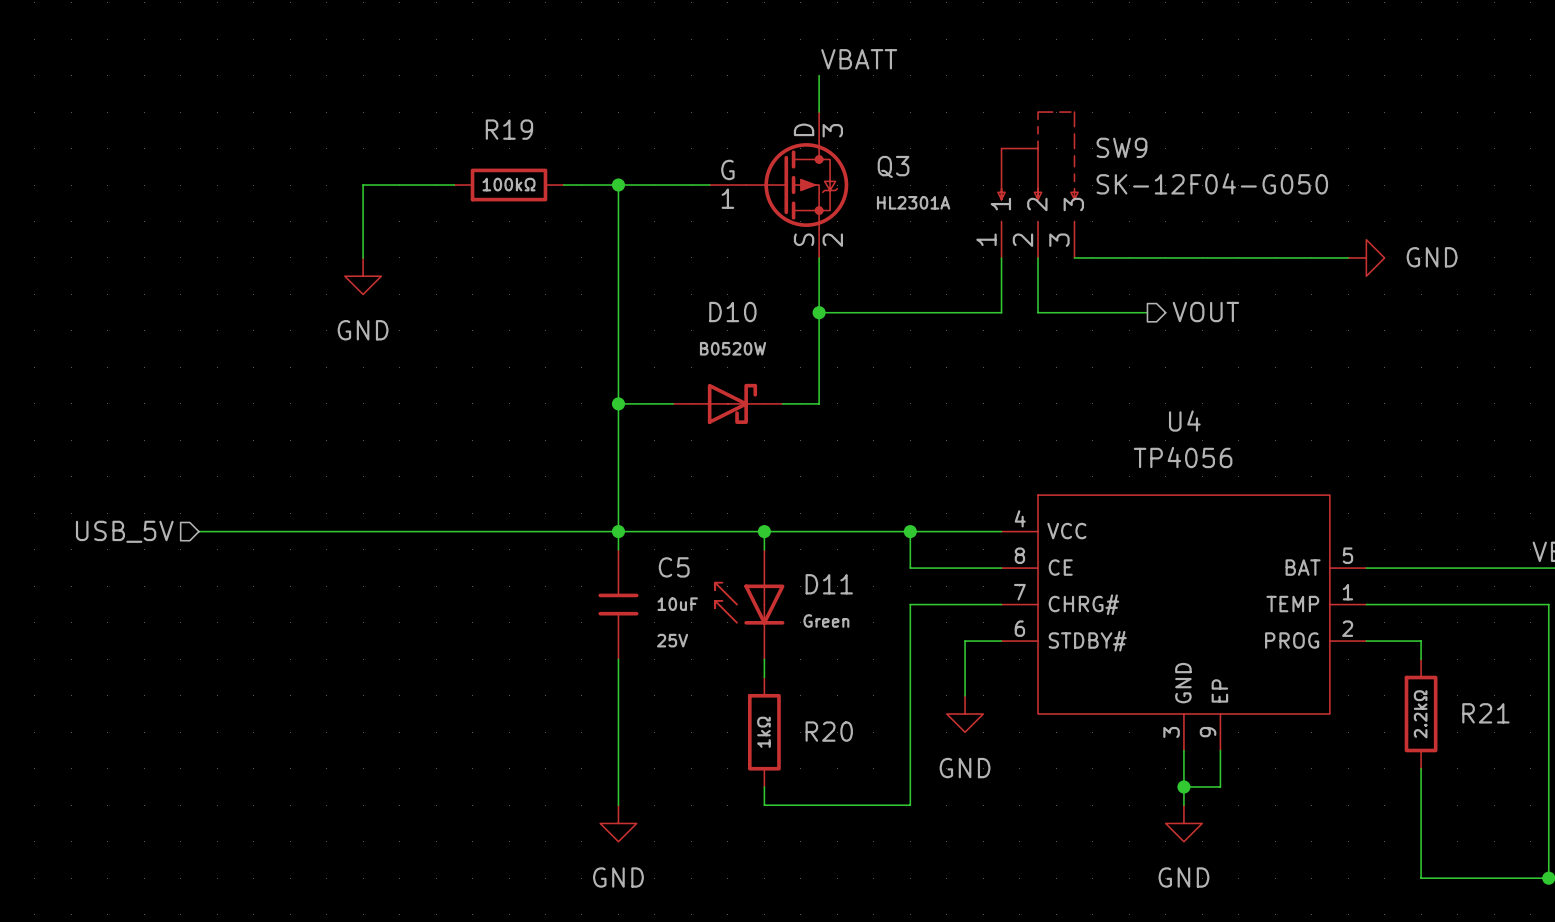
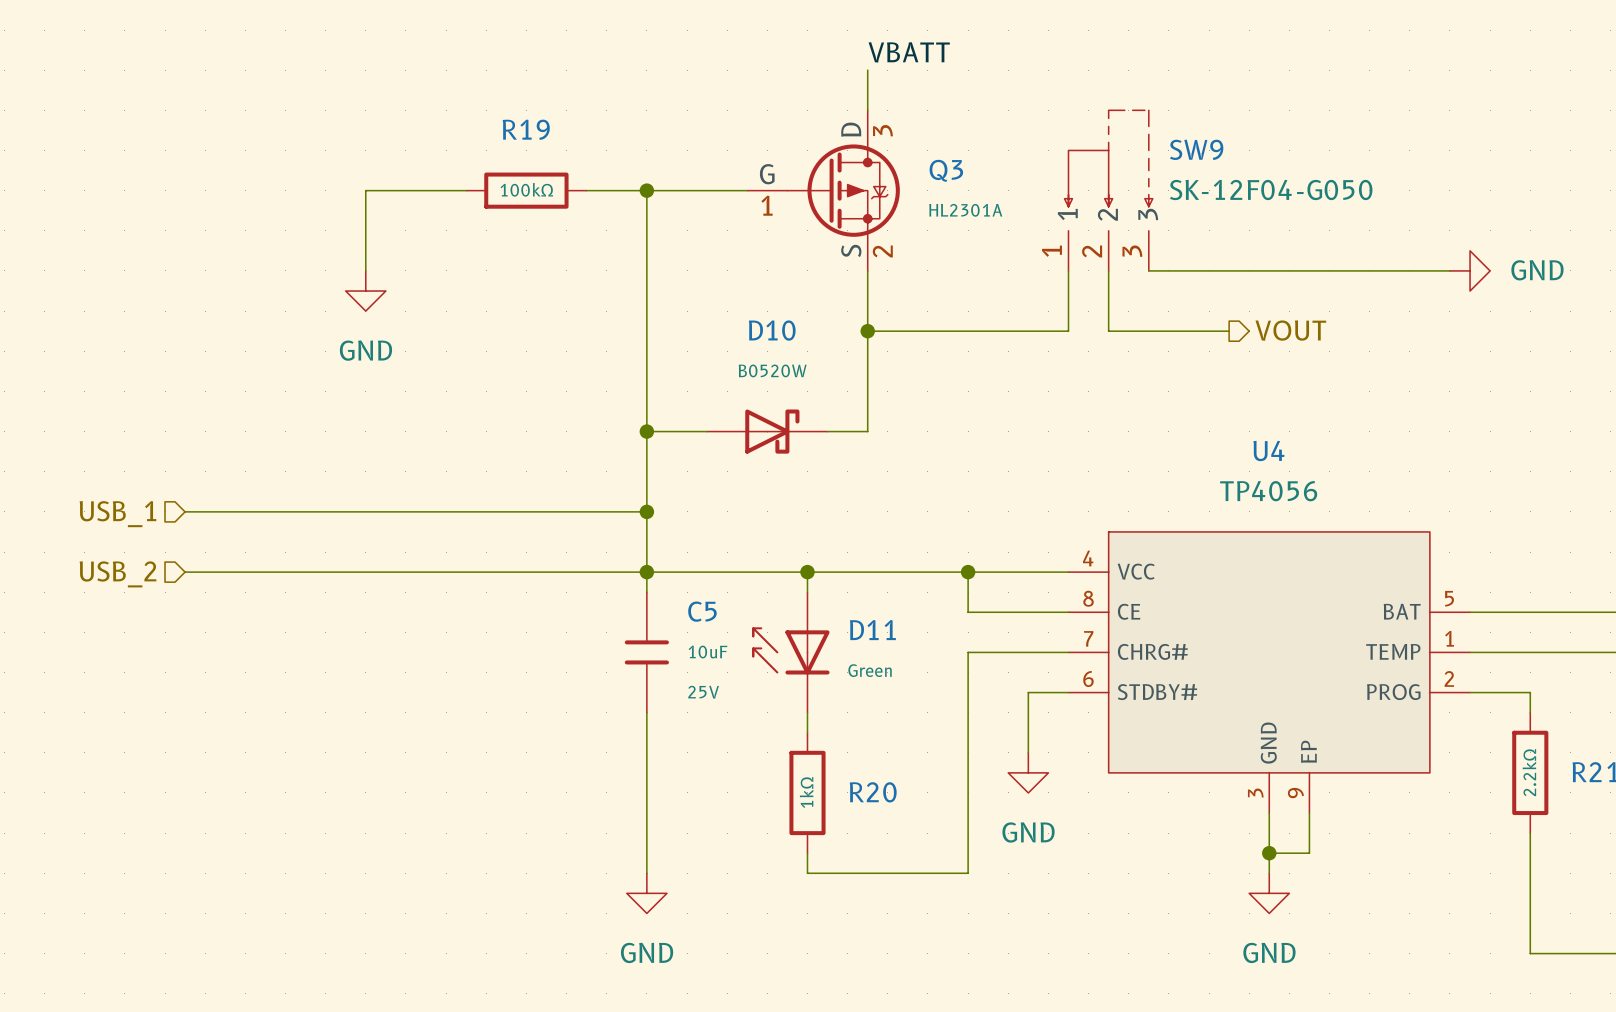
wire: none -> (185, 511) (646, 511)
junction: none -> (646, 511)
hierarchical label: none -> USB_1 (117, 514)
hierarchical label: USB_5V (124, 531) -> USB_2 (118, 574)

